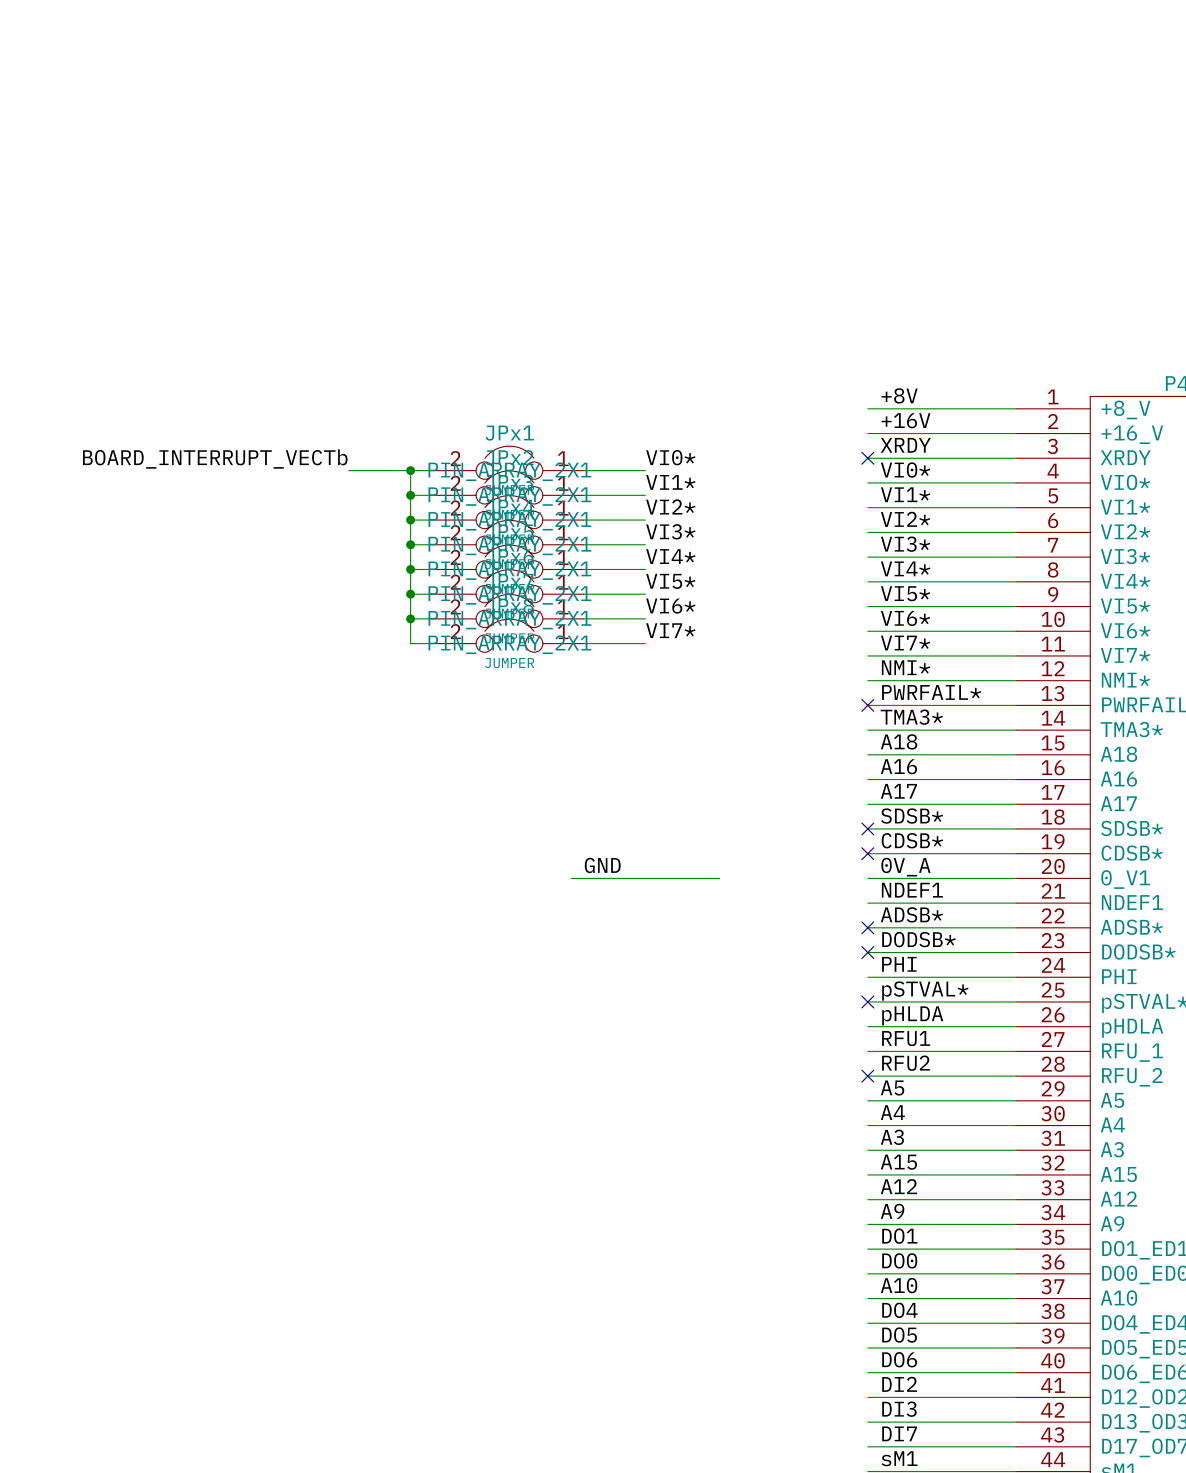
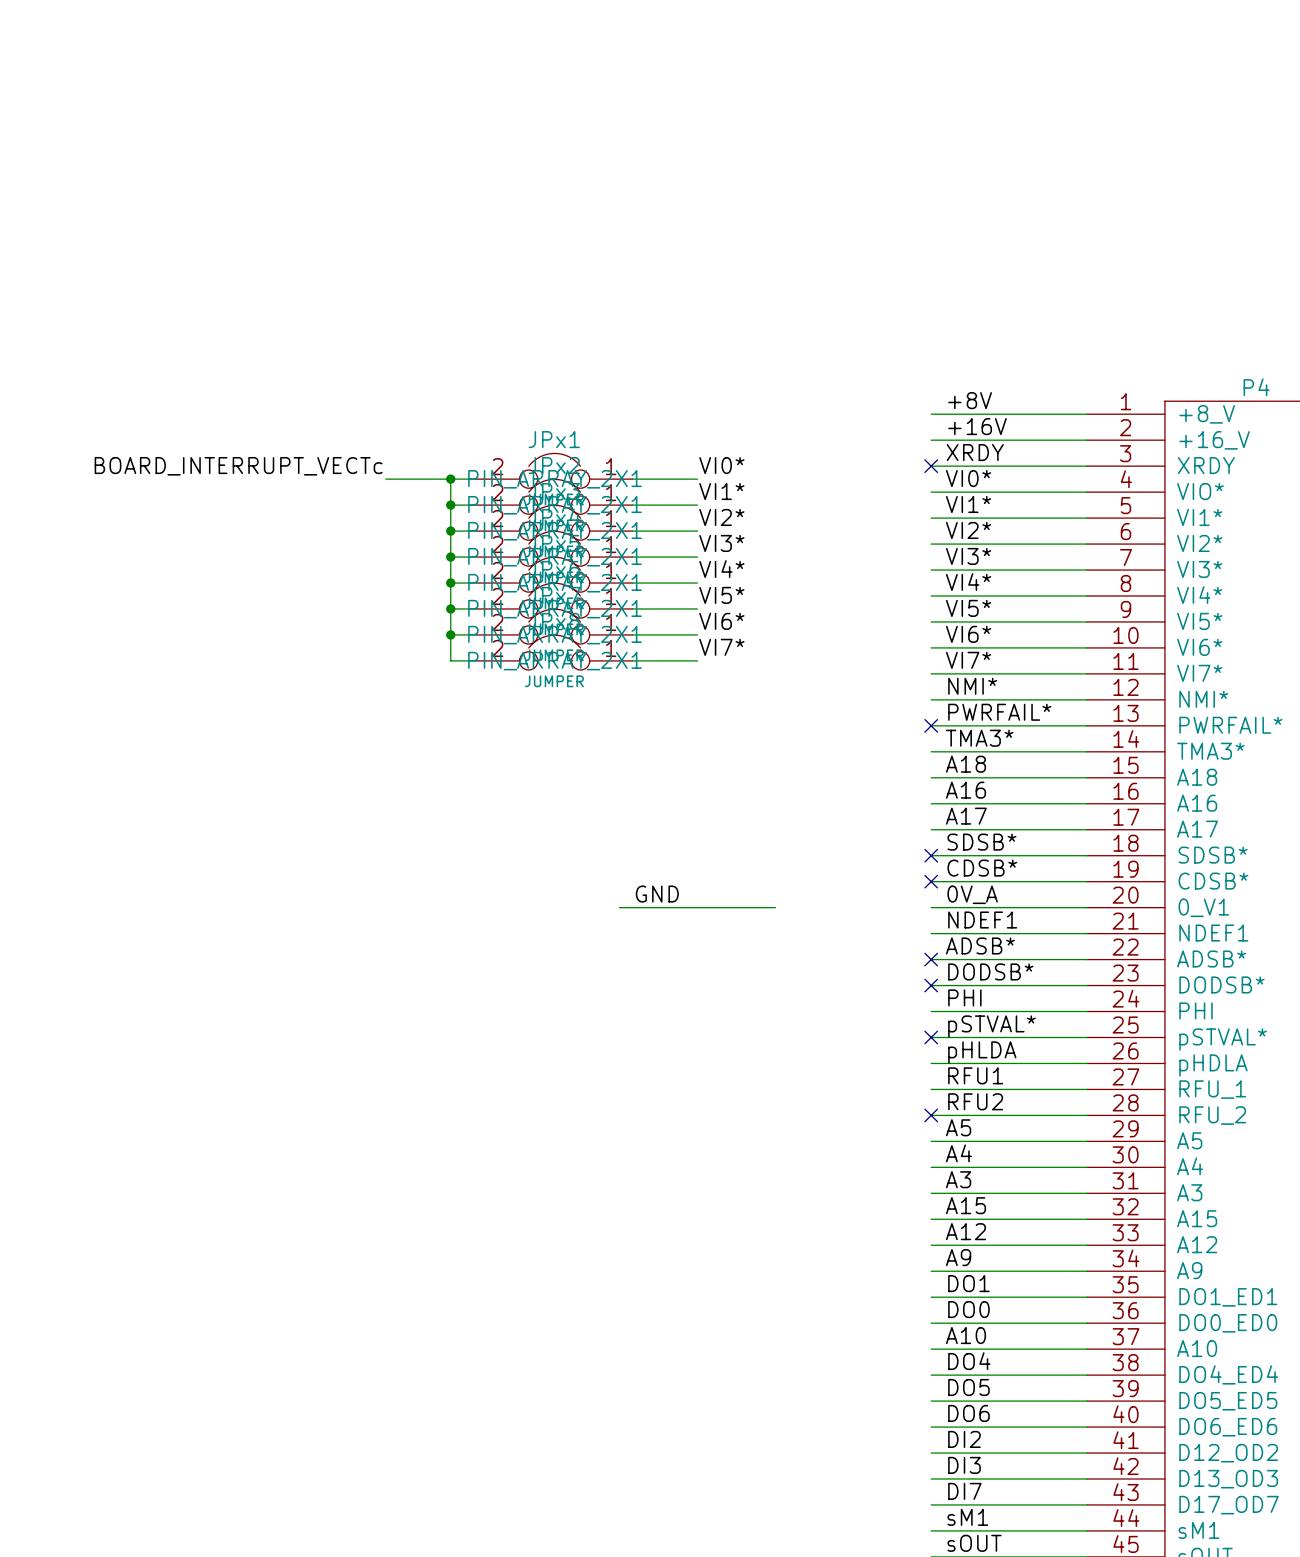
label: BOARD_INTERRUPT_VECTb (215, 459) -> BOARD_INTERRUPT_VECTc (238, 466)

